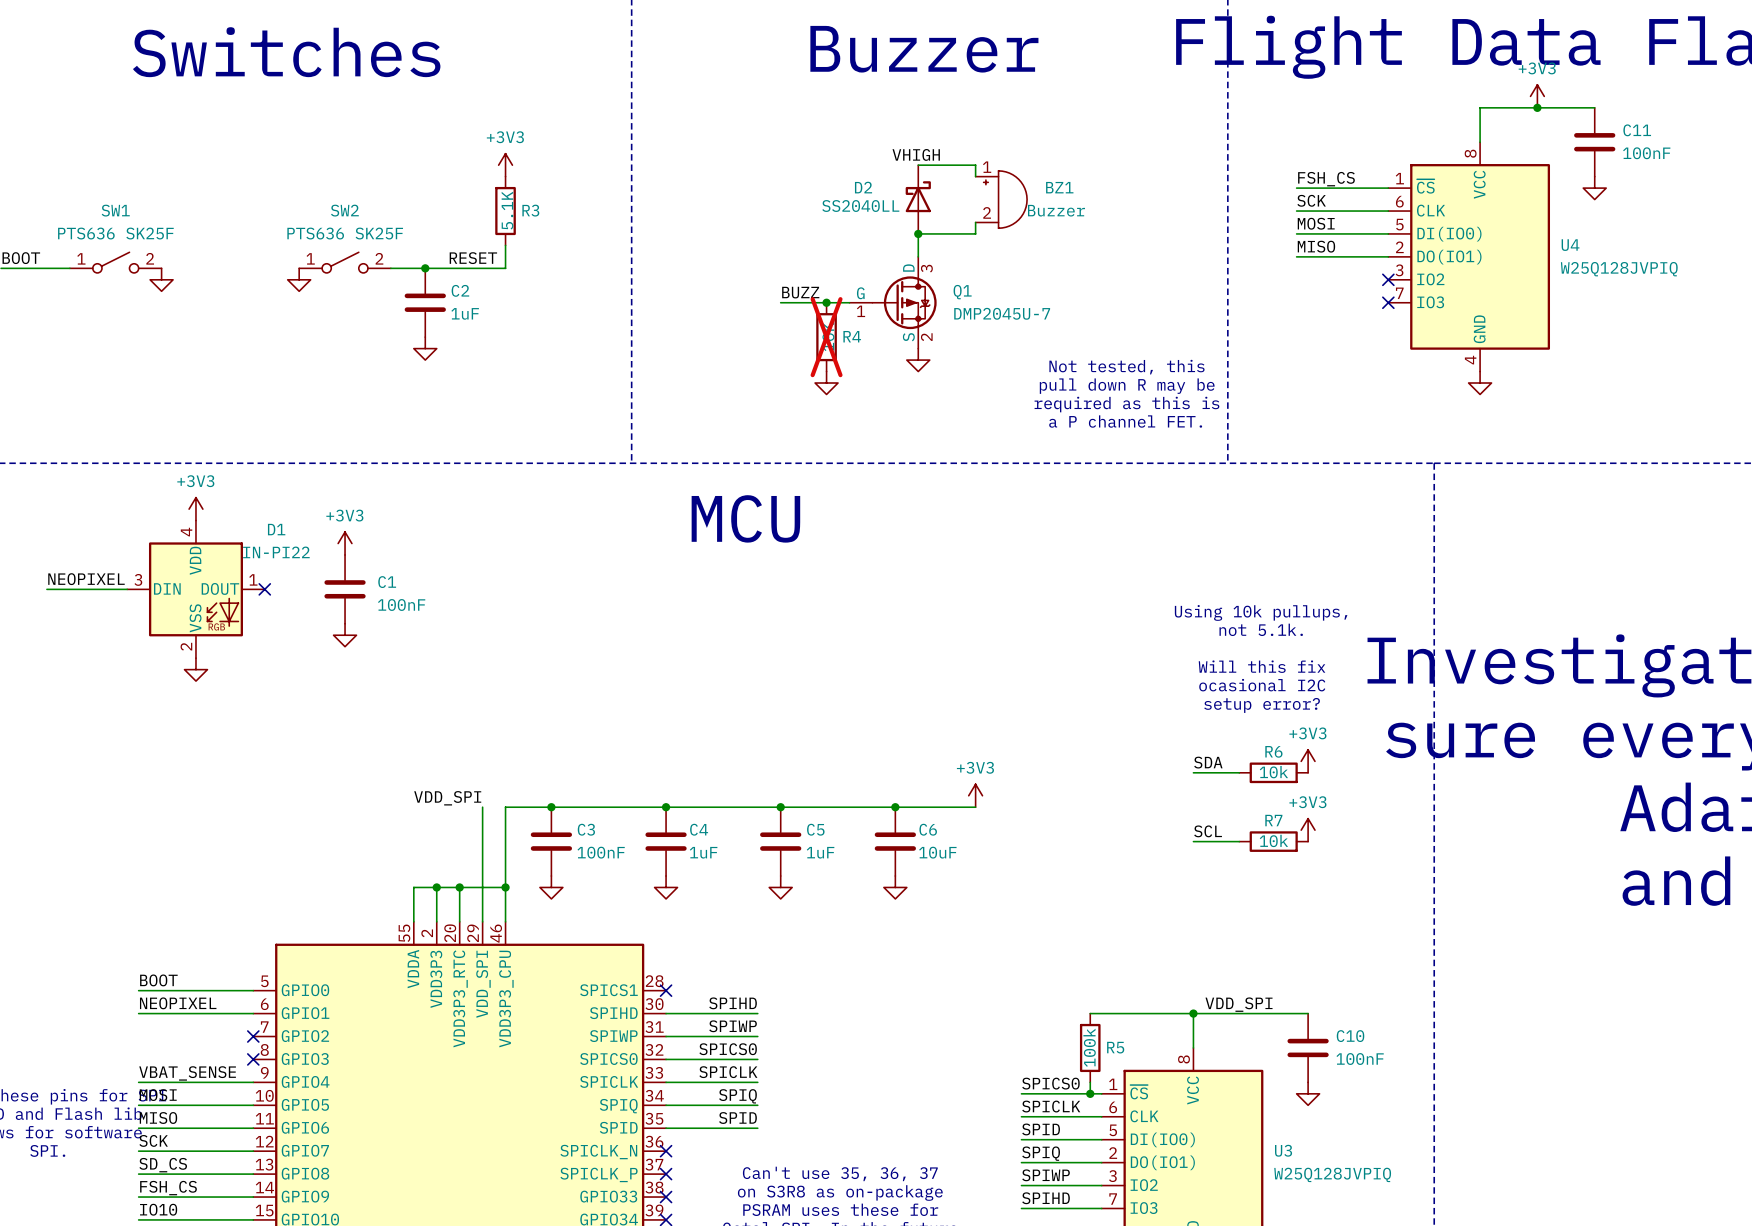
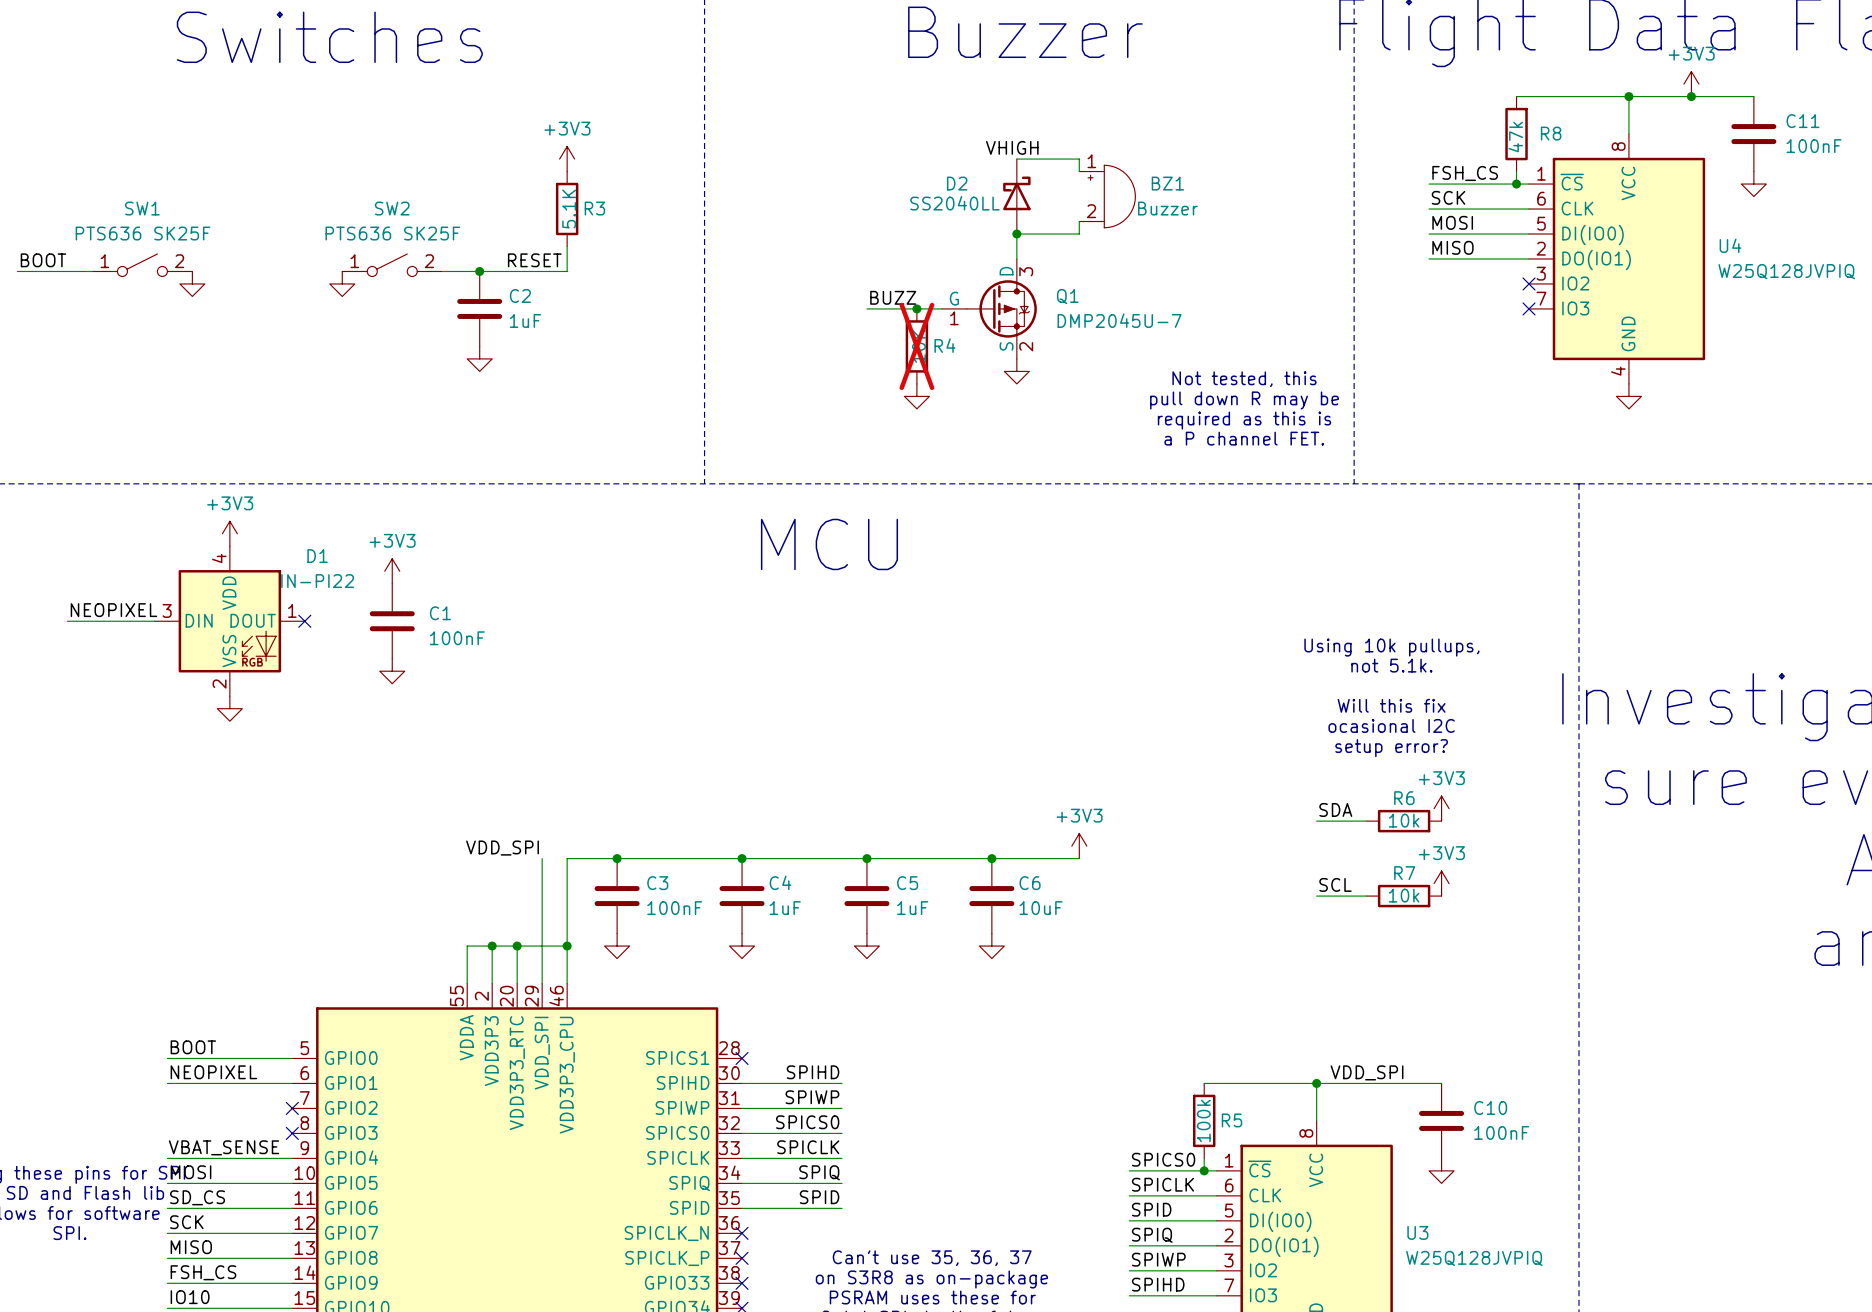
wire: none -> (1516, 96) (1628, 96)
junction: none -> (1628, 96)
R8: none -> 47k (1516, 134)
wire: none -> (1516, 171) (1516, 184)
junction: none -> (1516, 184)
label: MISO (158, 1118) -> SD_CS (197, 1197)
label: SD_CS (163, 1165) -> MISO (191, 1247)

